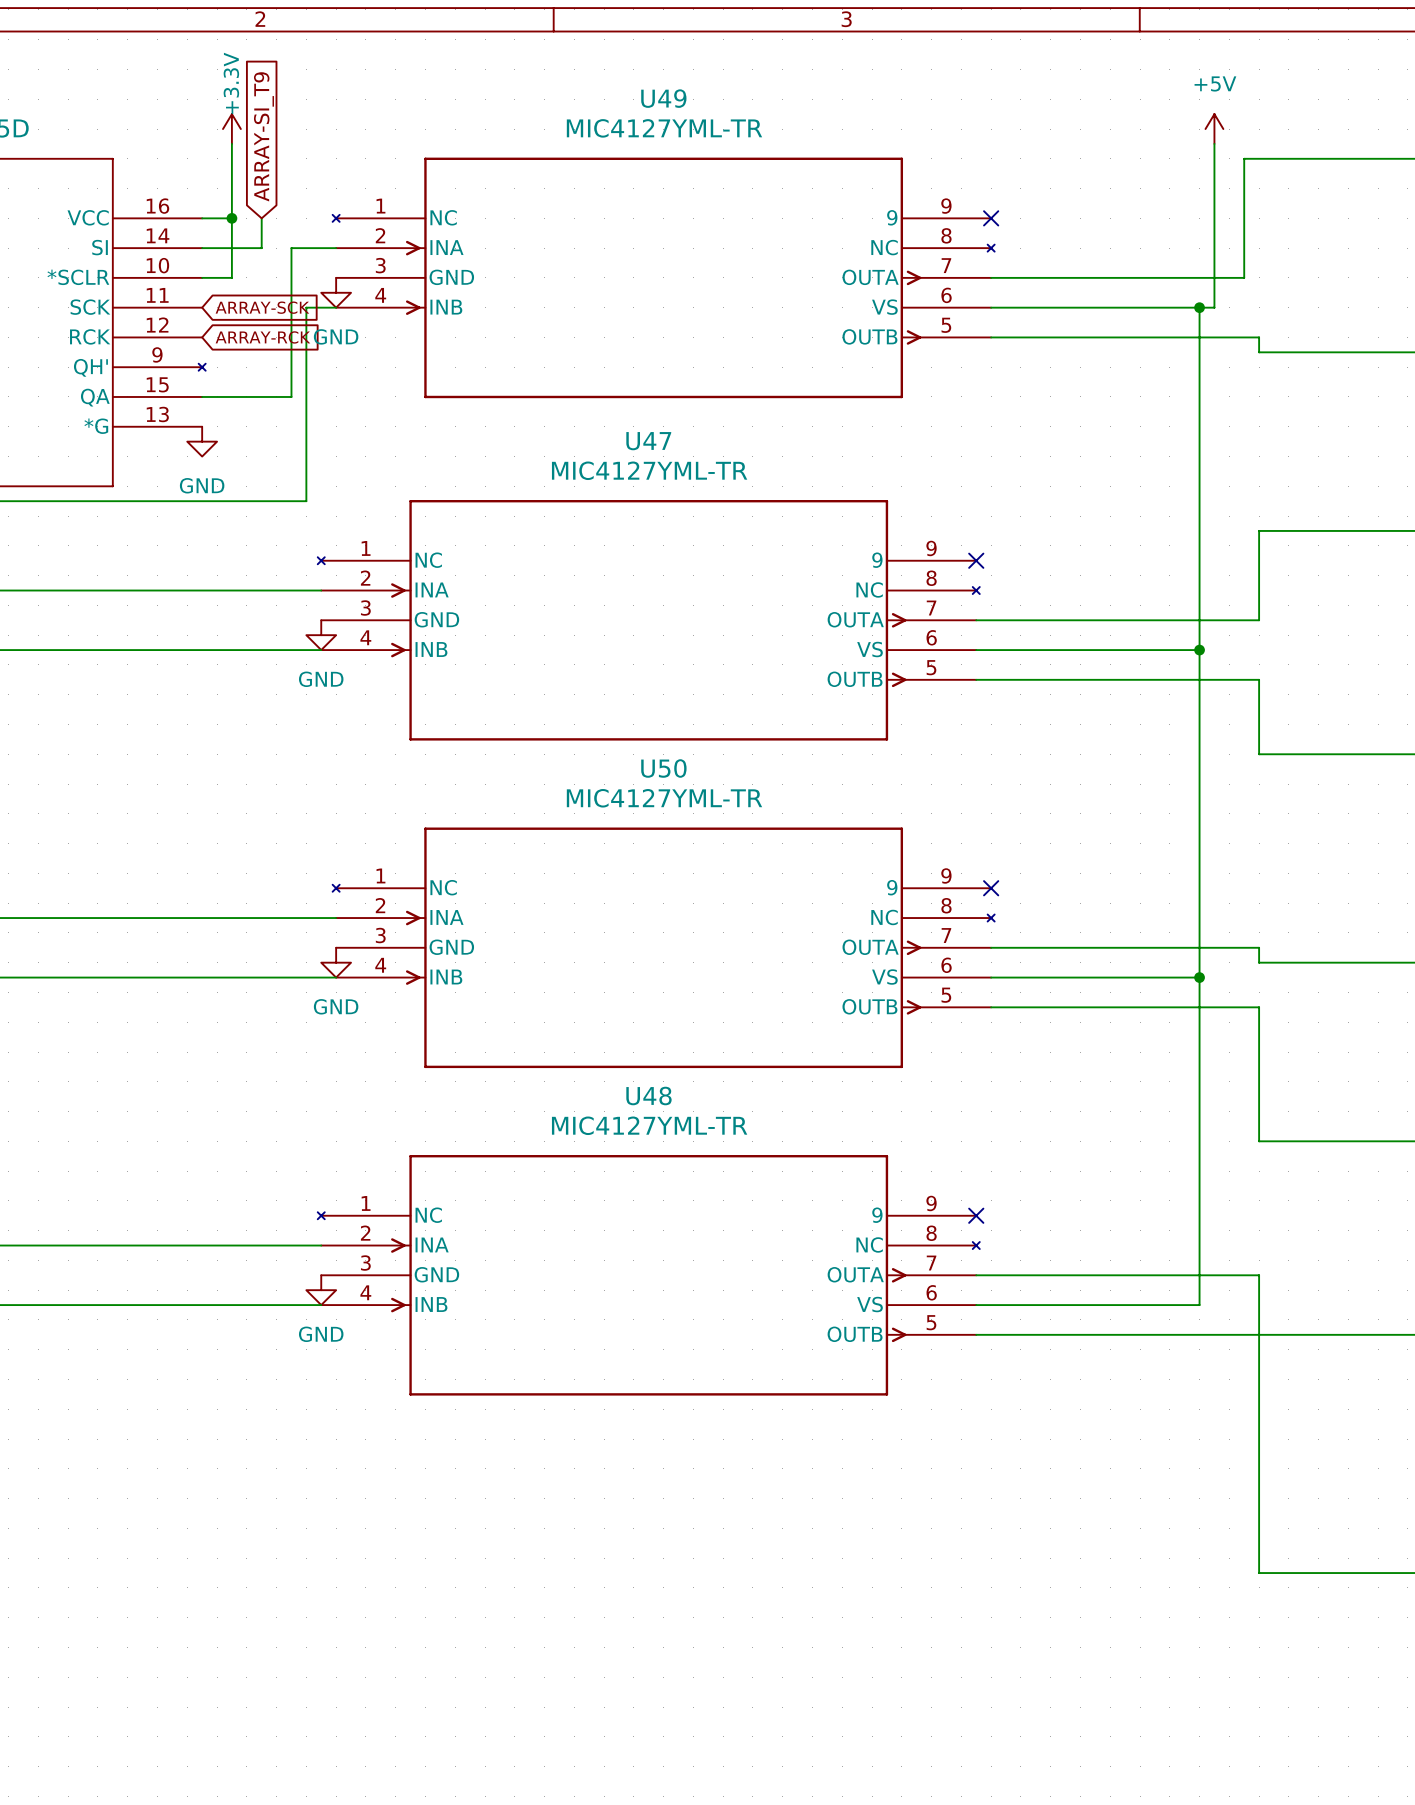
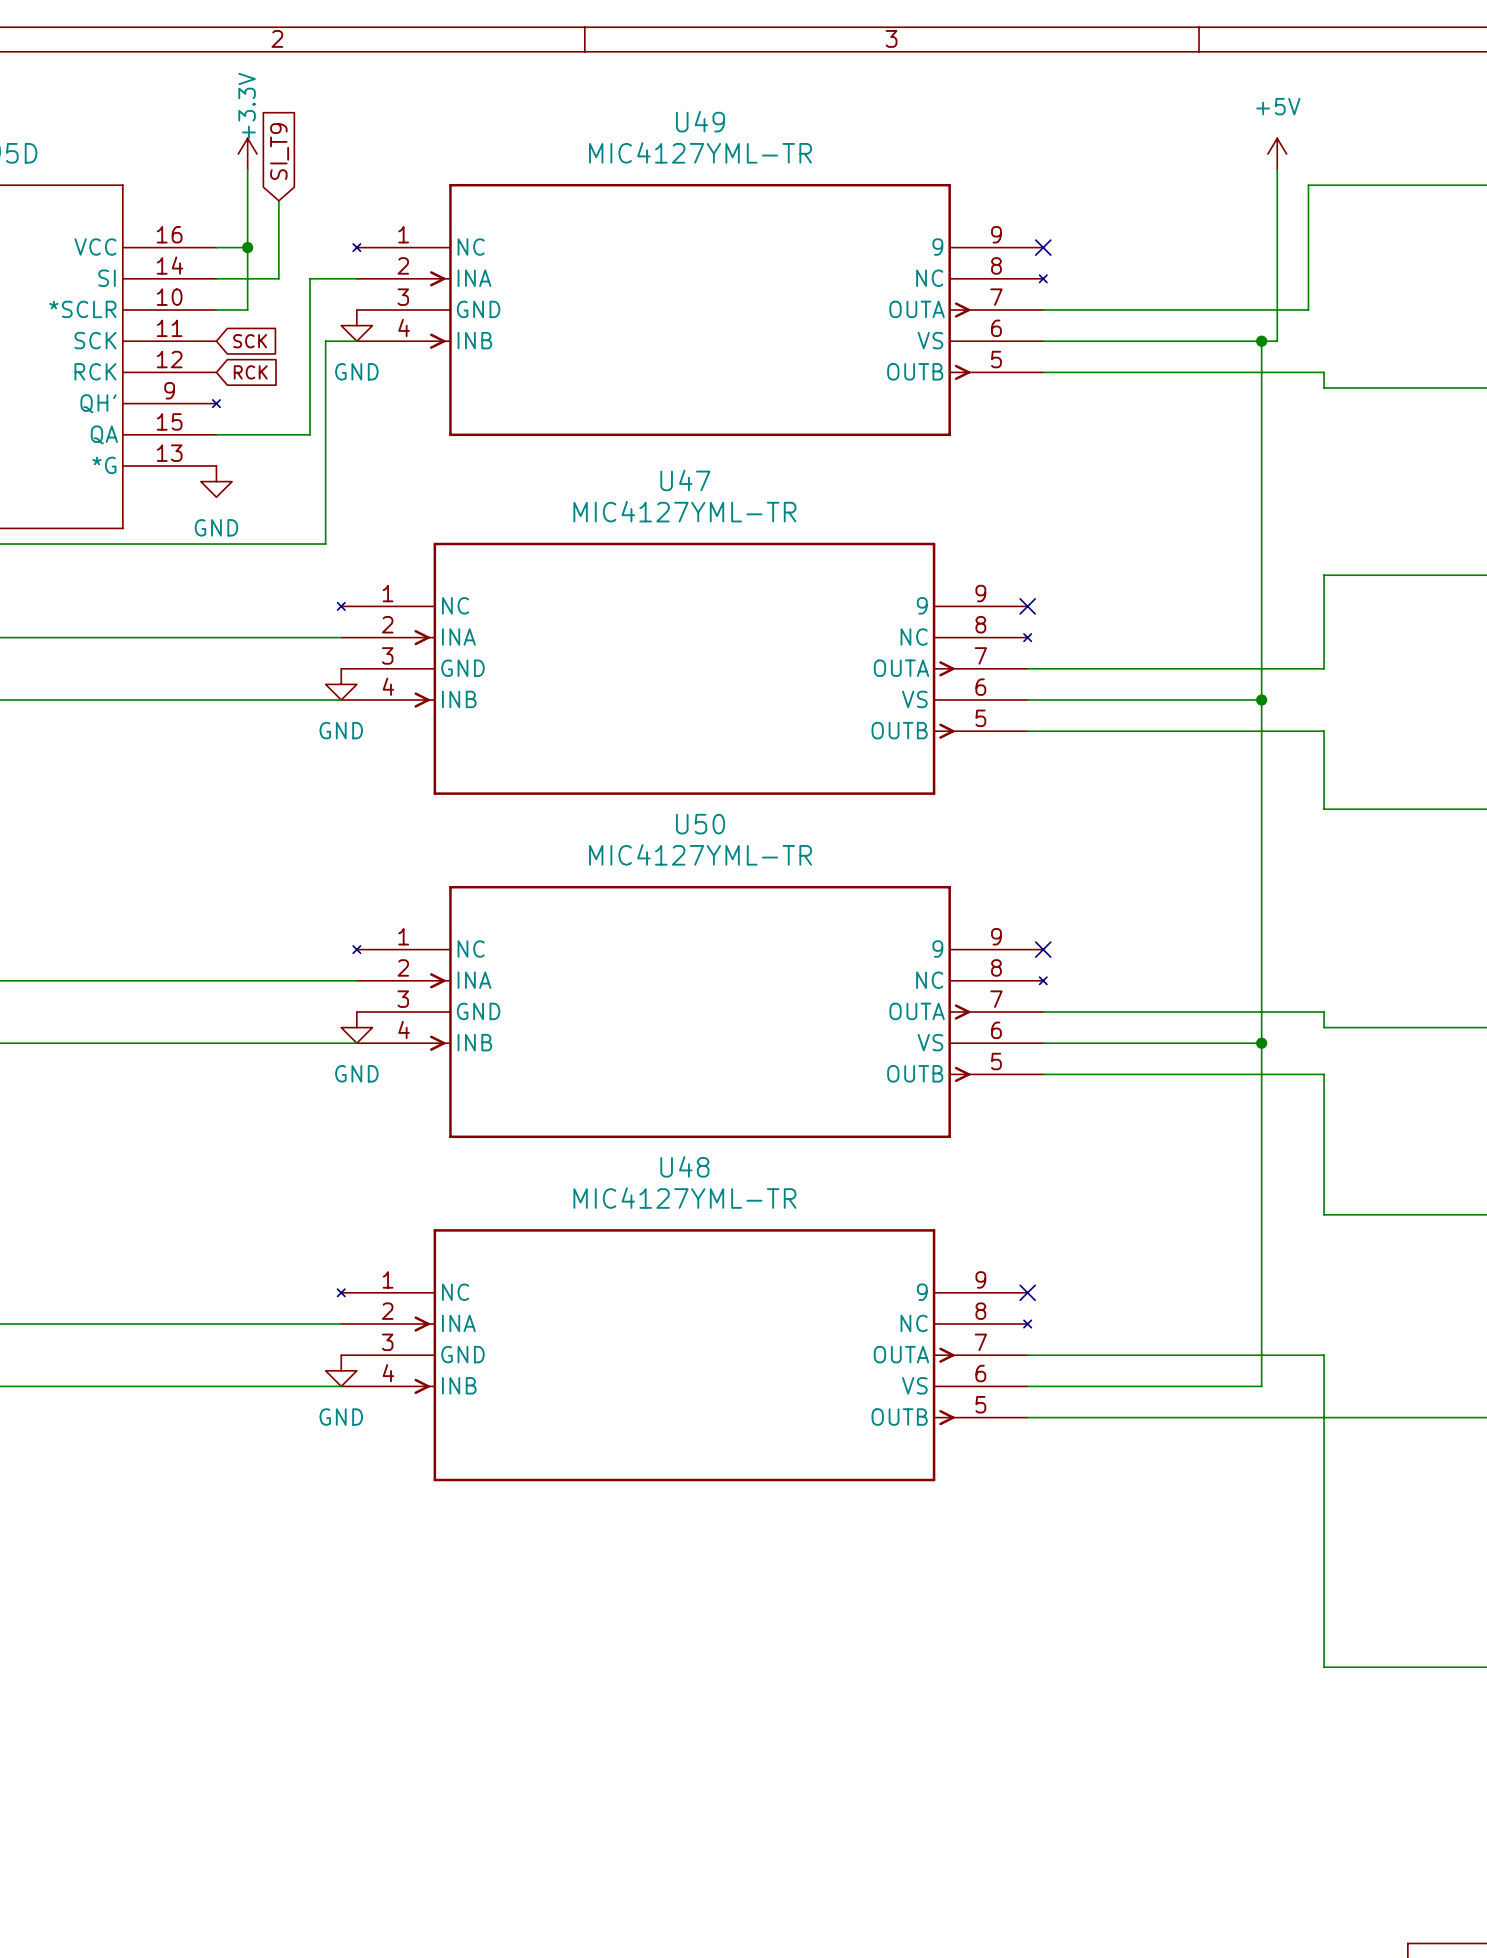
global label: ARRAY-SI_T9 (263, 136) -> SI_T9 (279, 151)
wire: none -> (278, 200) (278, 247)
global label: ARRAY-SCK (262, 307) -> SCK (250, 341)
global label: ARRAY-RCK (262, 337) -> RCK (250, 372)

